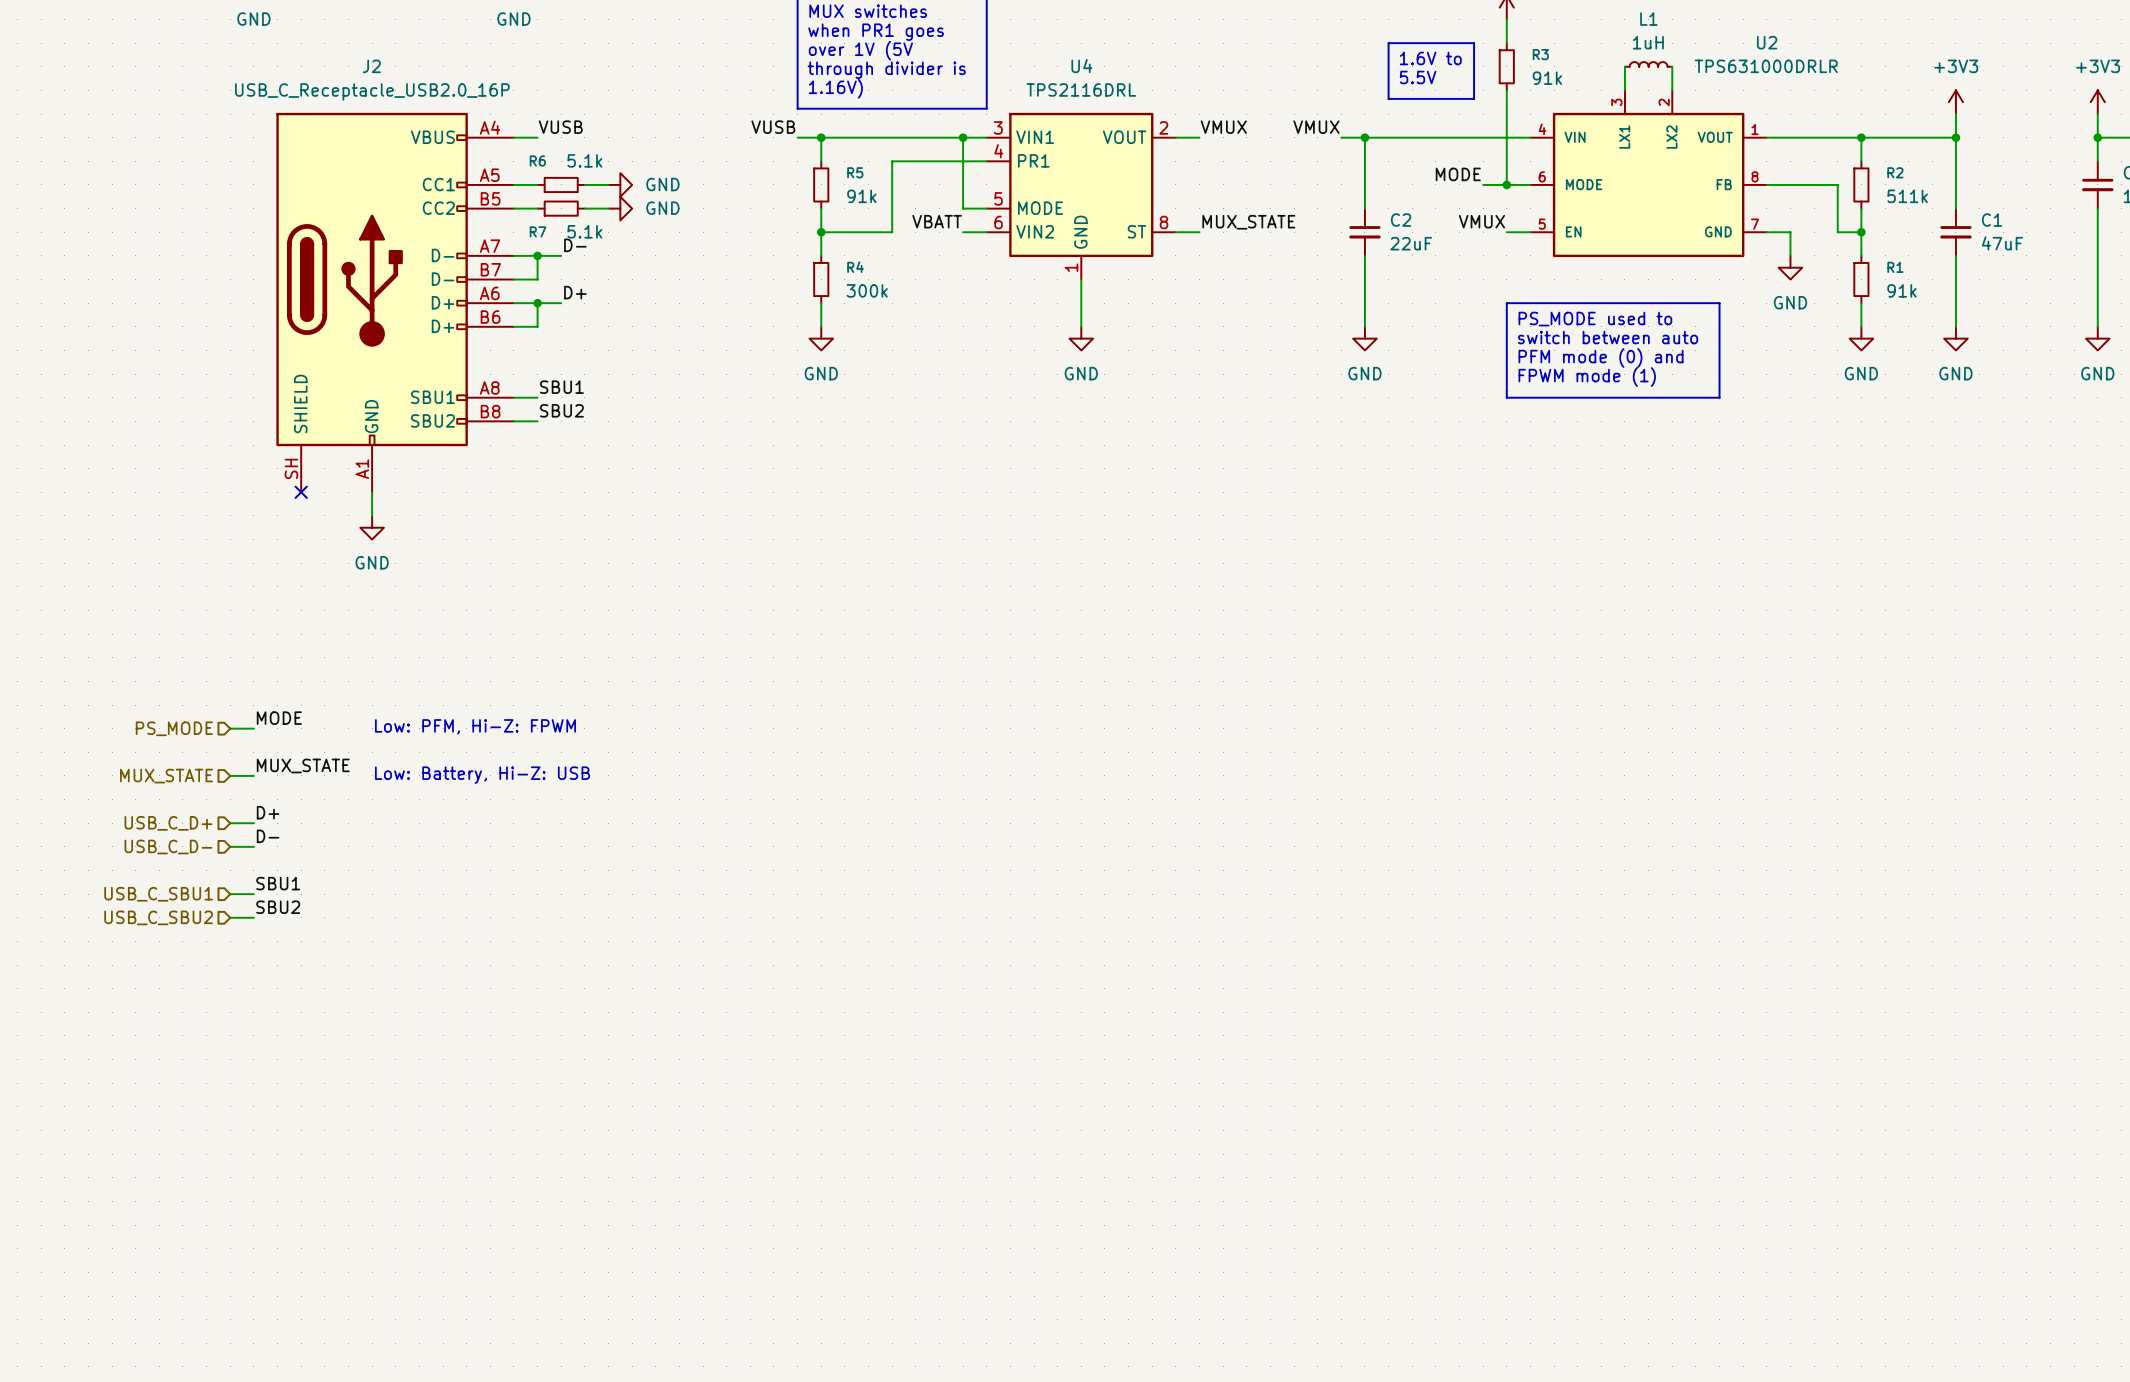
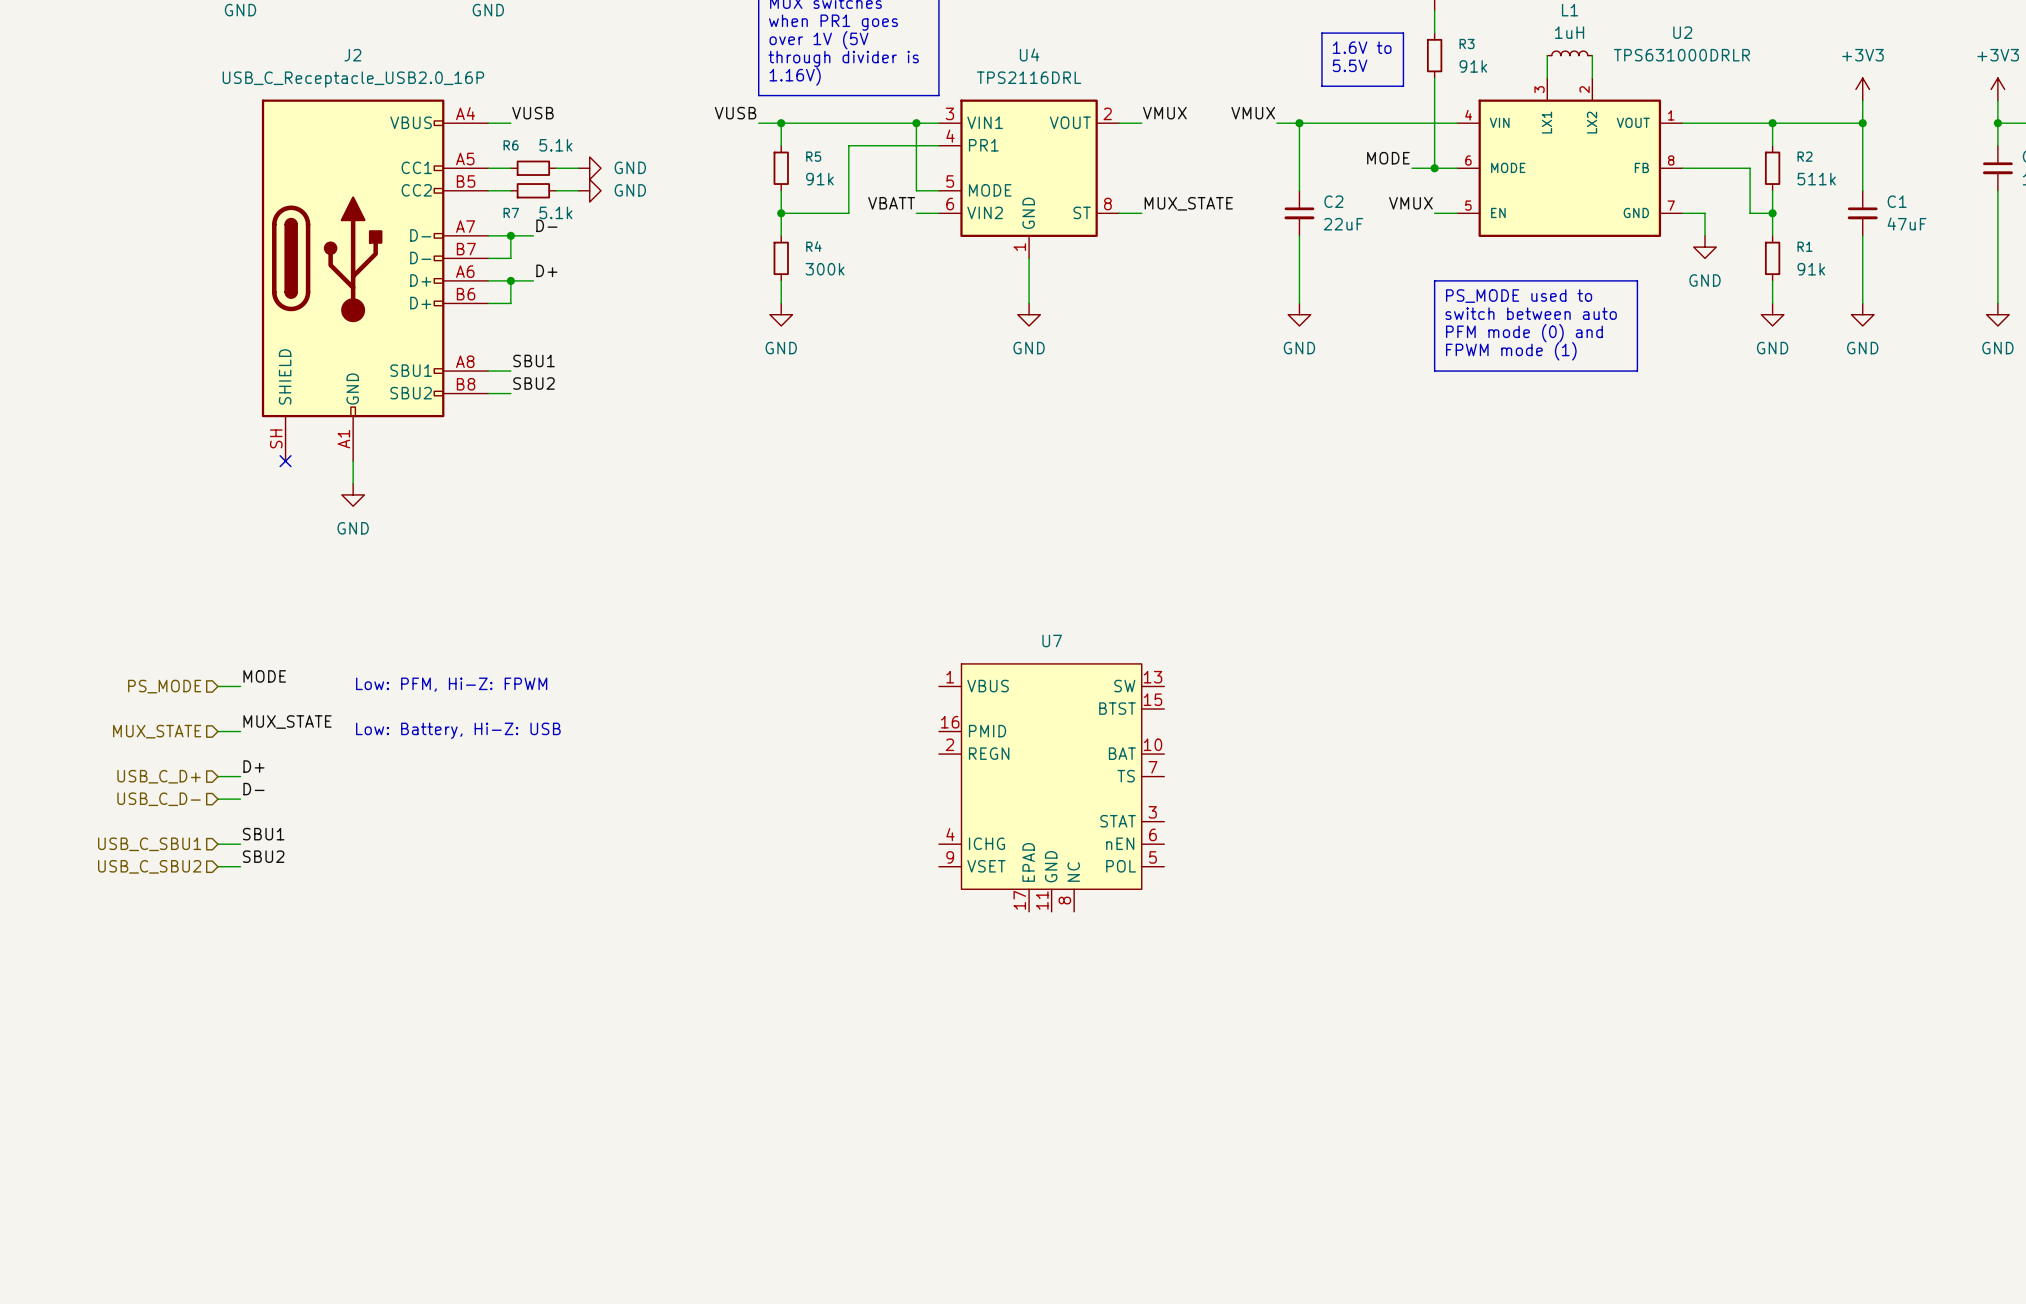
U7: none -> (1051, 787)

